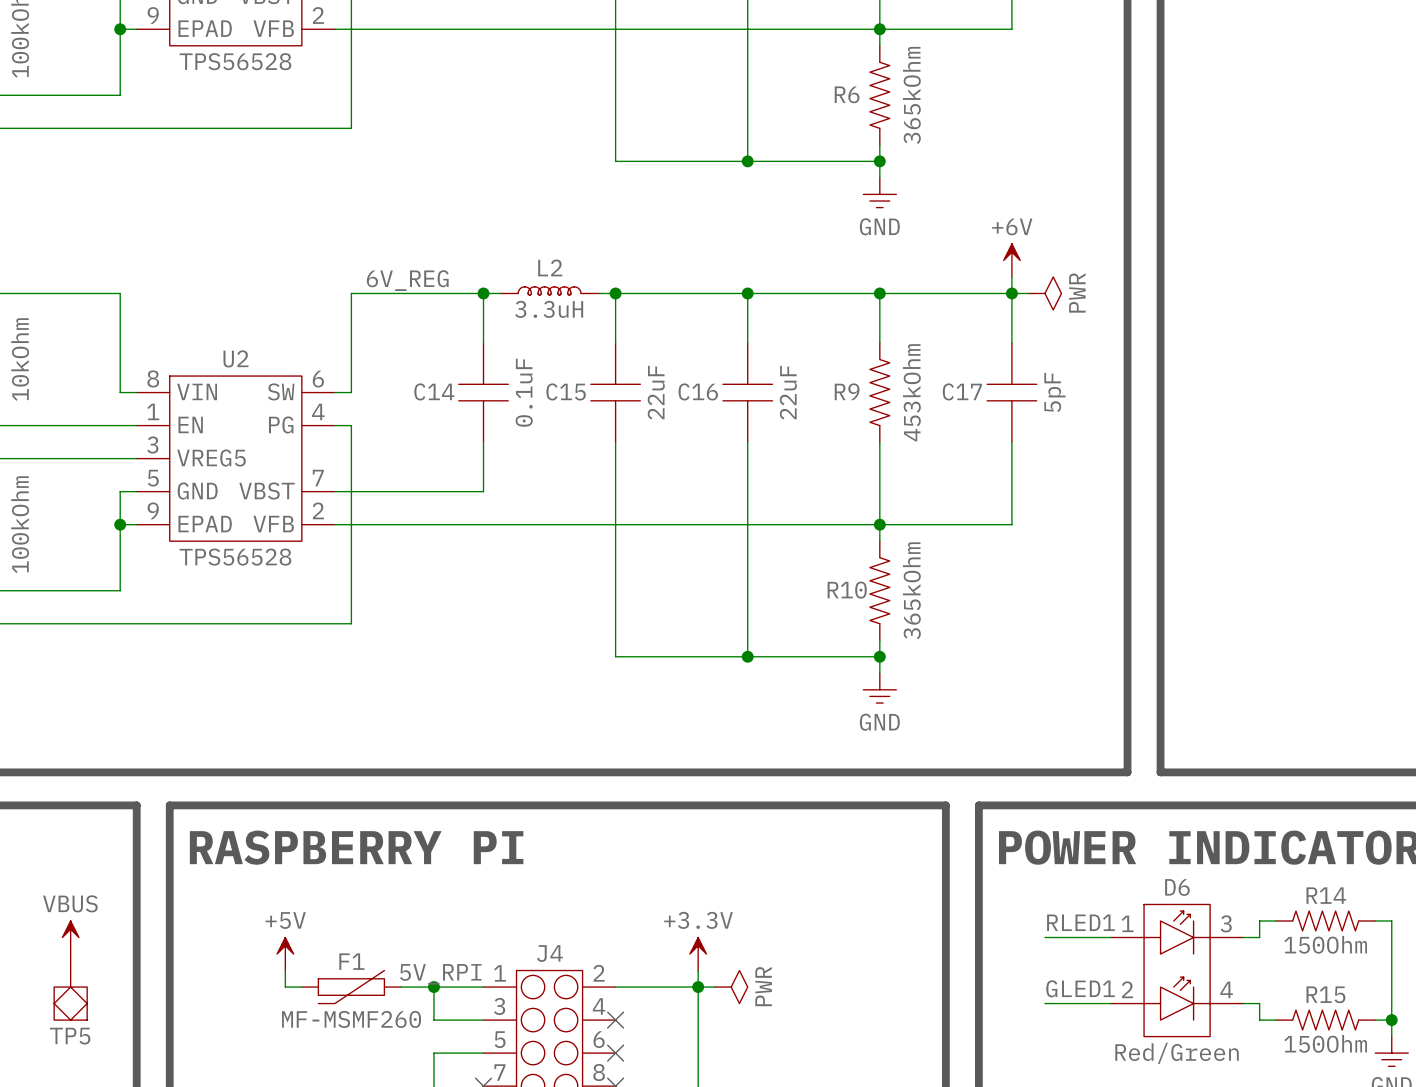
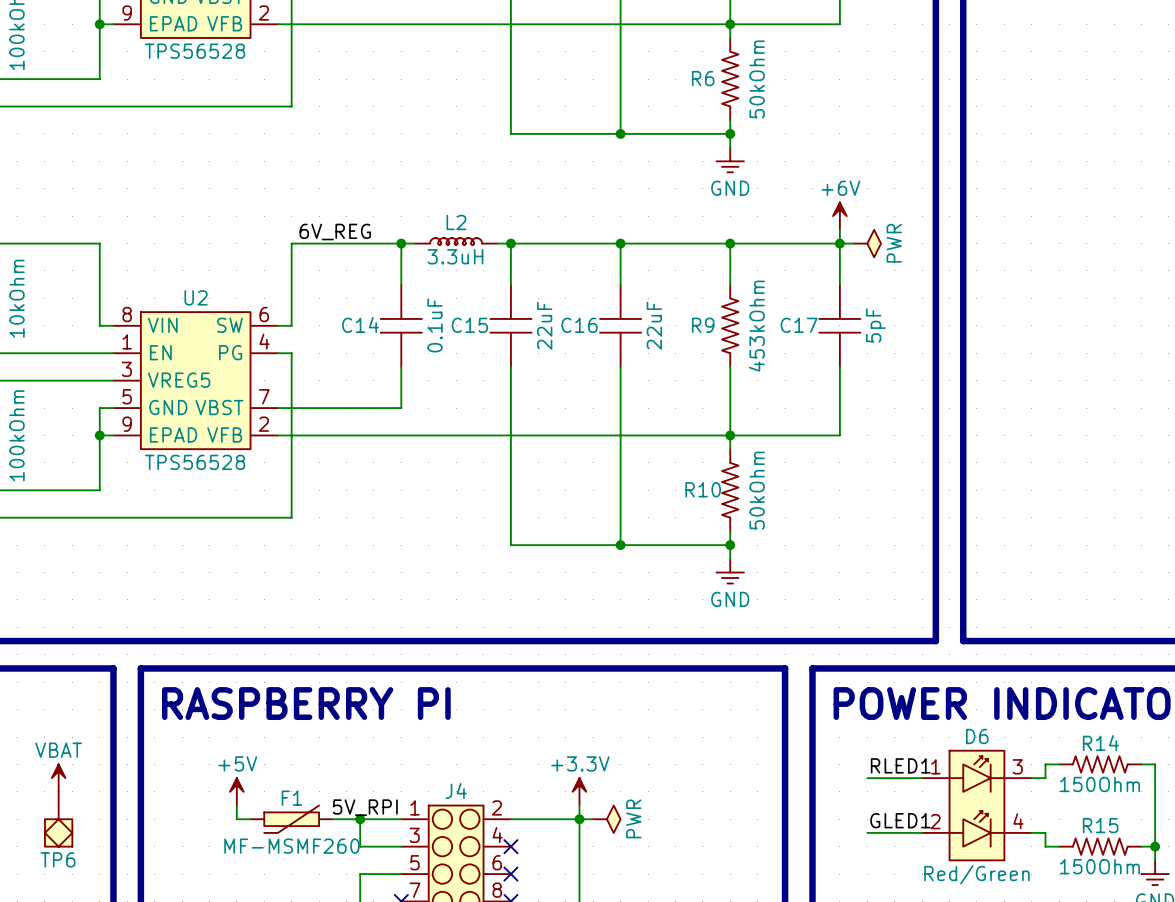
R6 value: 365kOhm (911, 95) -> 50kOhm (757, 79)
R10 value: 365kOhm (911, 590) -> 50kOhm (757, 490)
power symbol: VBUS (70, 937) -> VBAT (58, 778)
TP5 name: TP5 (70, 1036) -> TP6 (57, 859)

